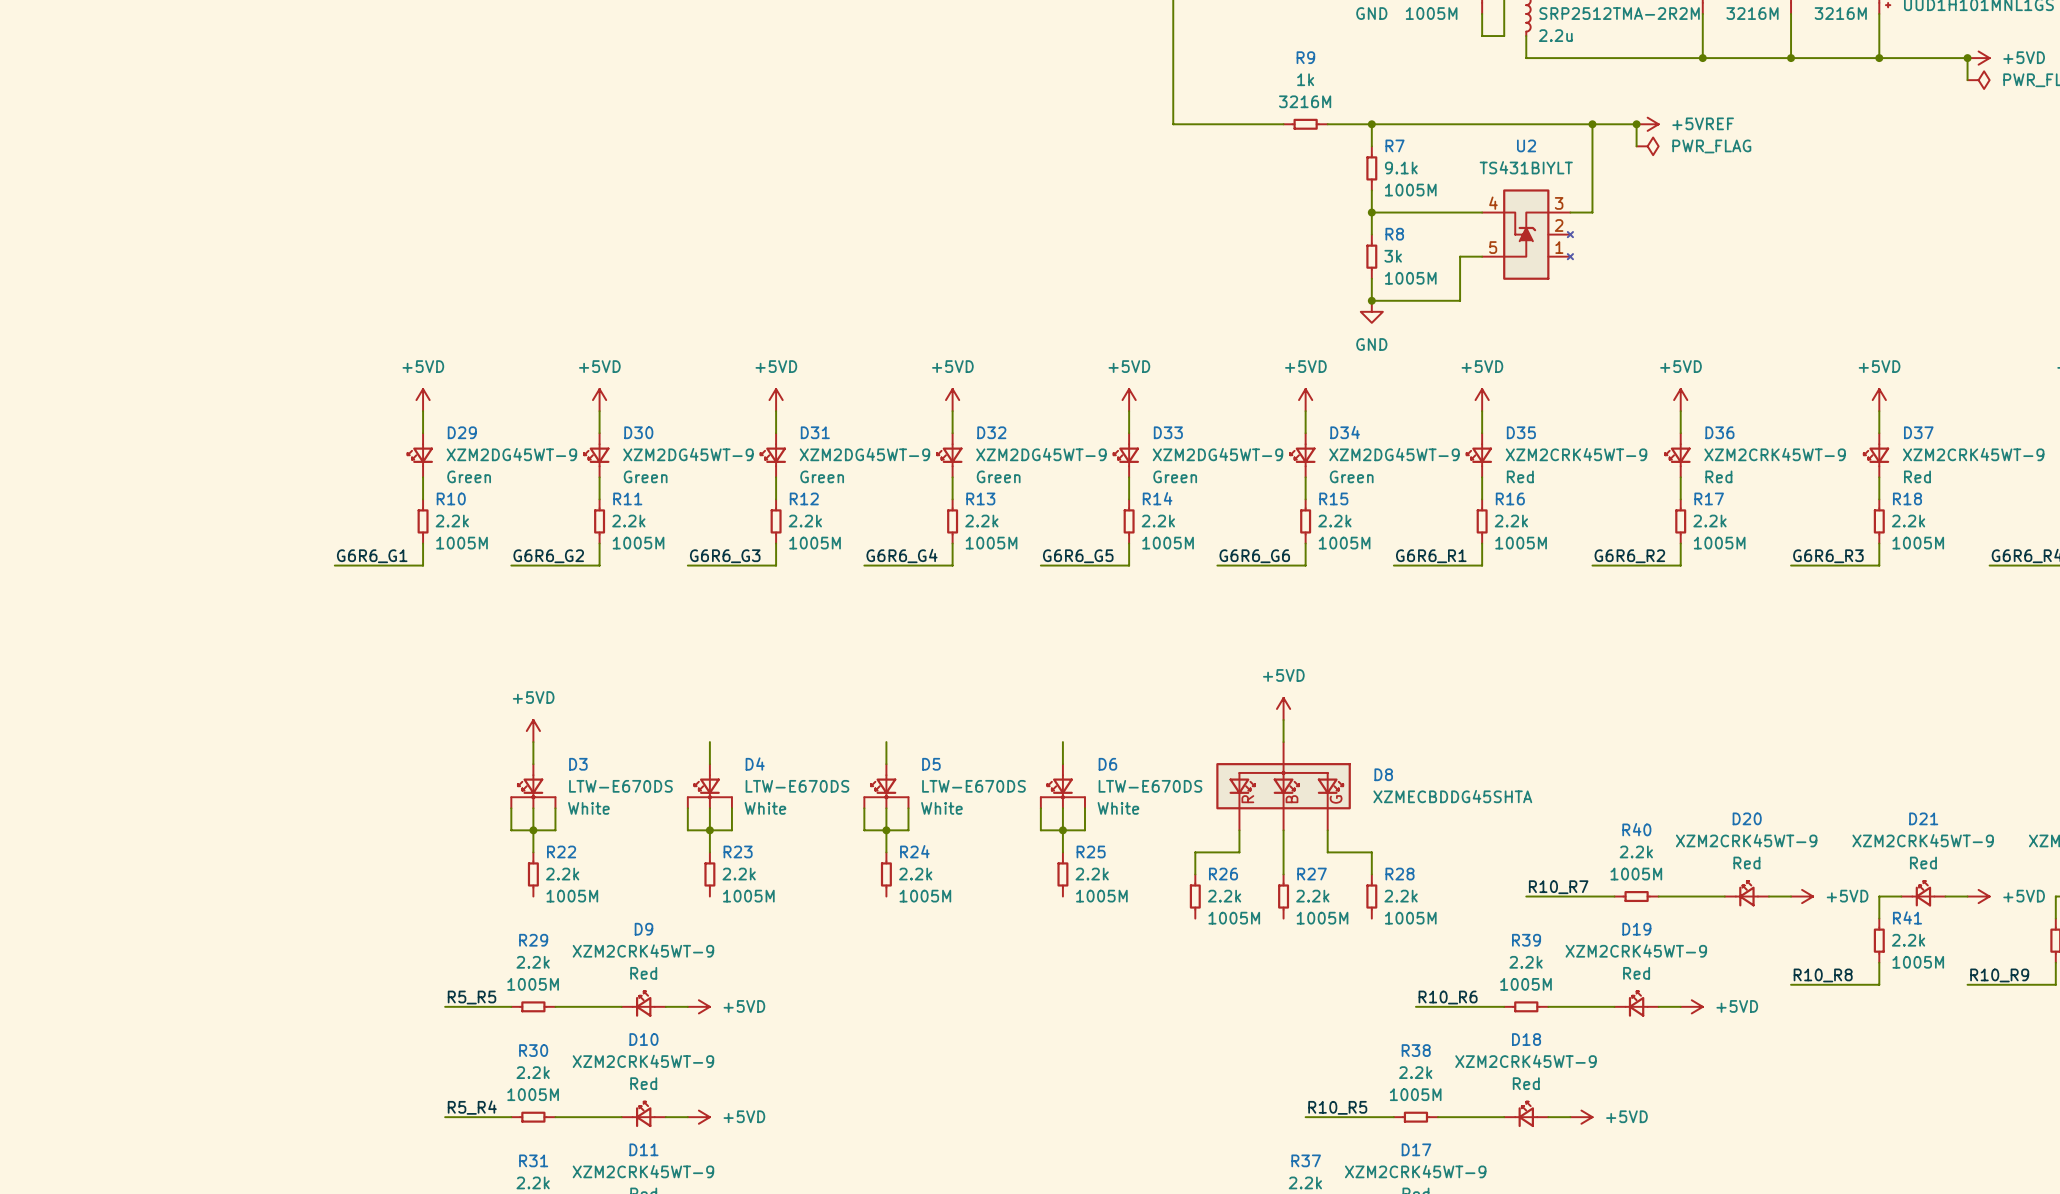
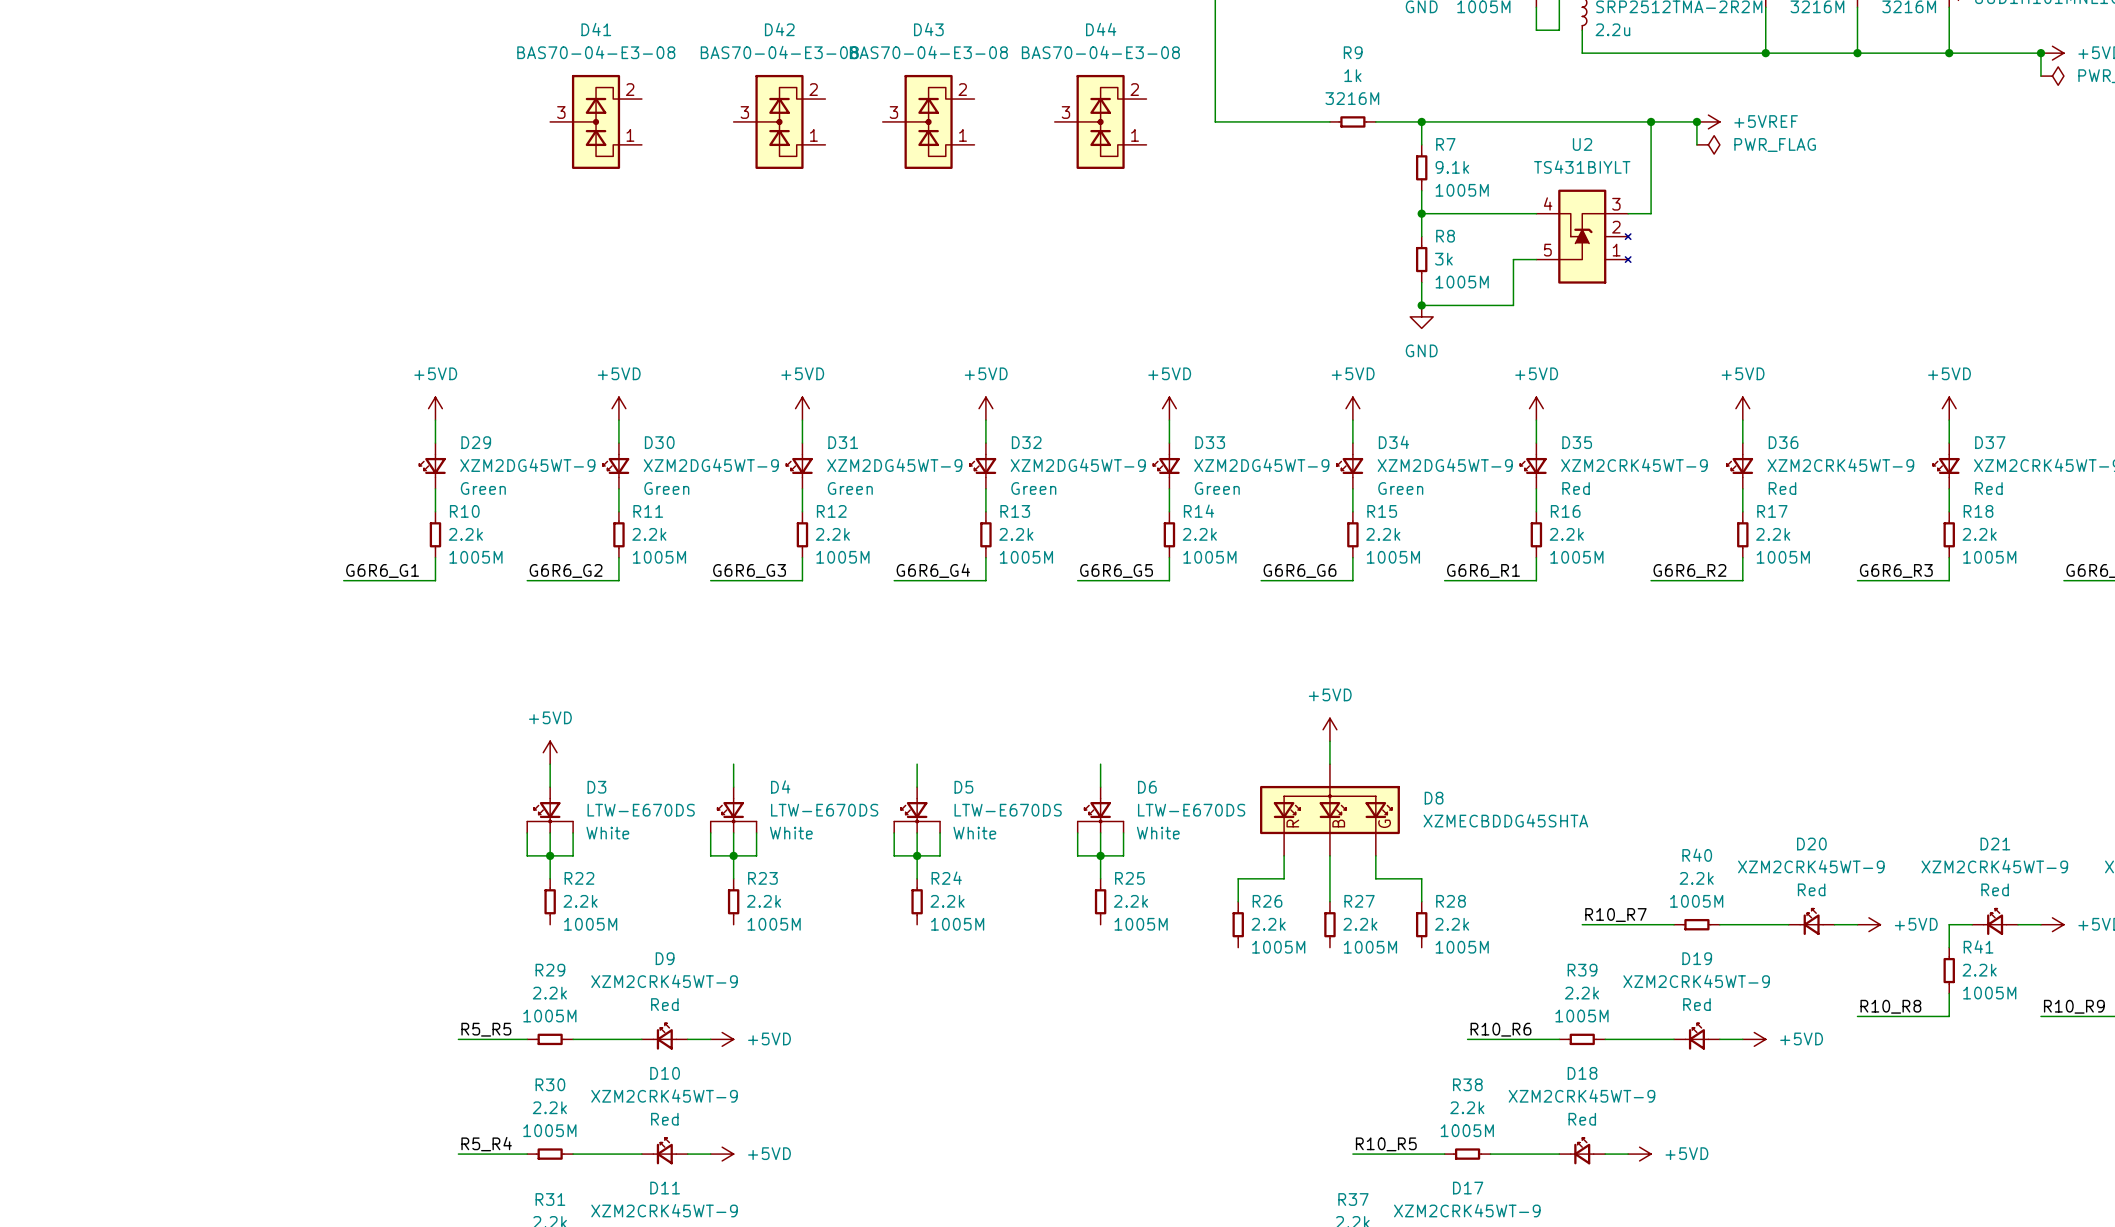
D41: none -> BAS70-04-E3-08 (596, 121)
D42: none -> BAS70-04-E3-08 (779, 121)
D43: none -> BAS70-04-E3-08 (928, 121)
D44: none -> BAS70-04-E3-08 (1100, 121)

